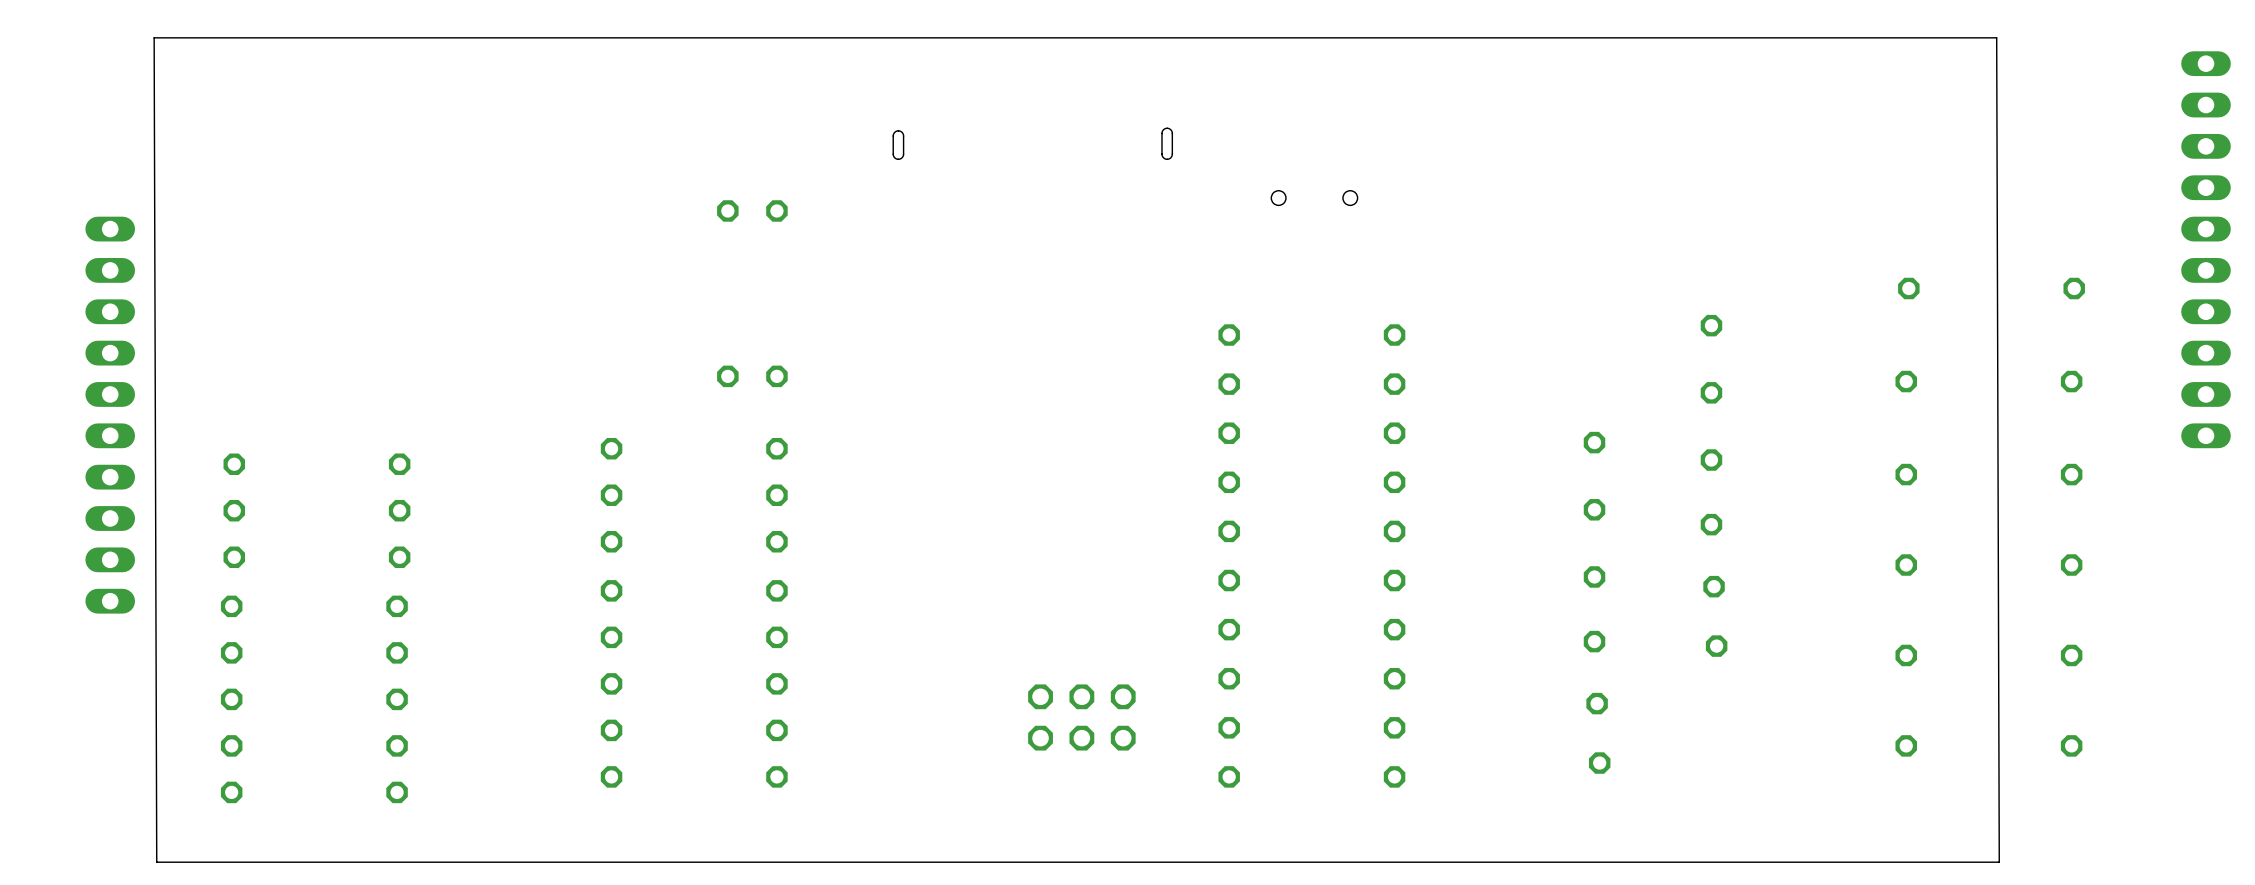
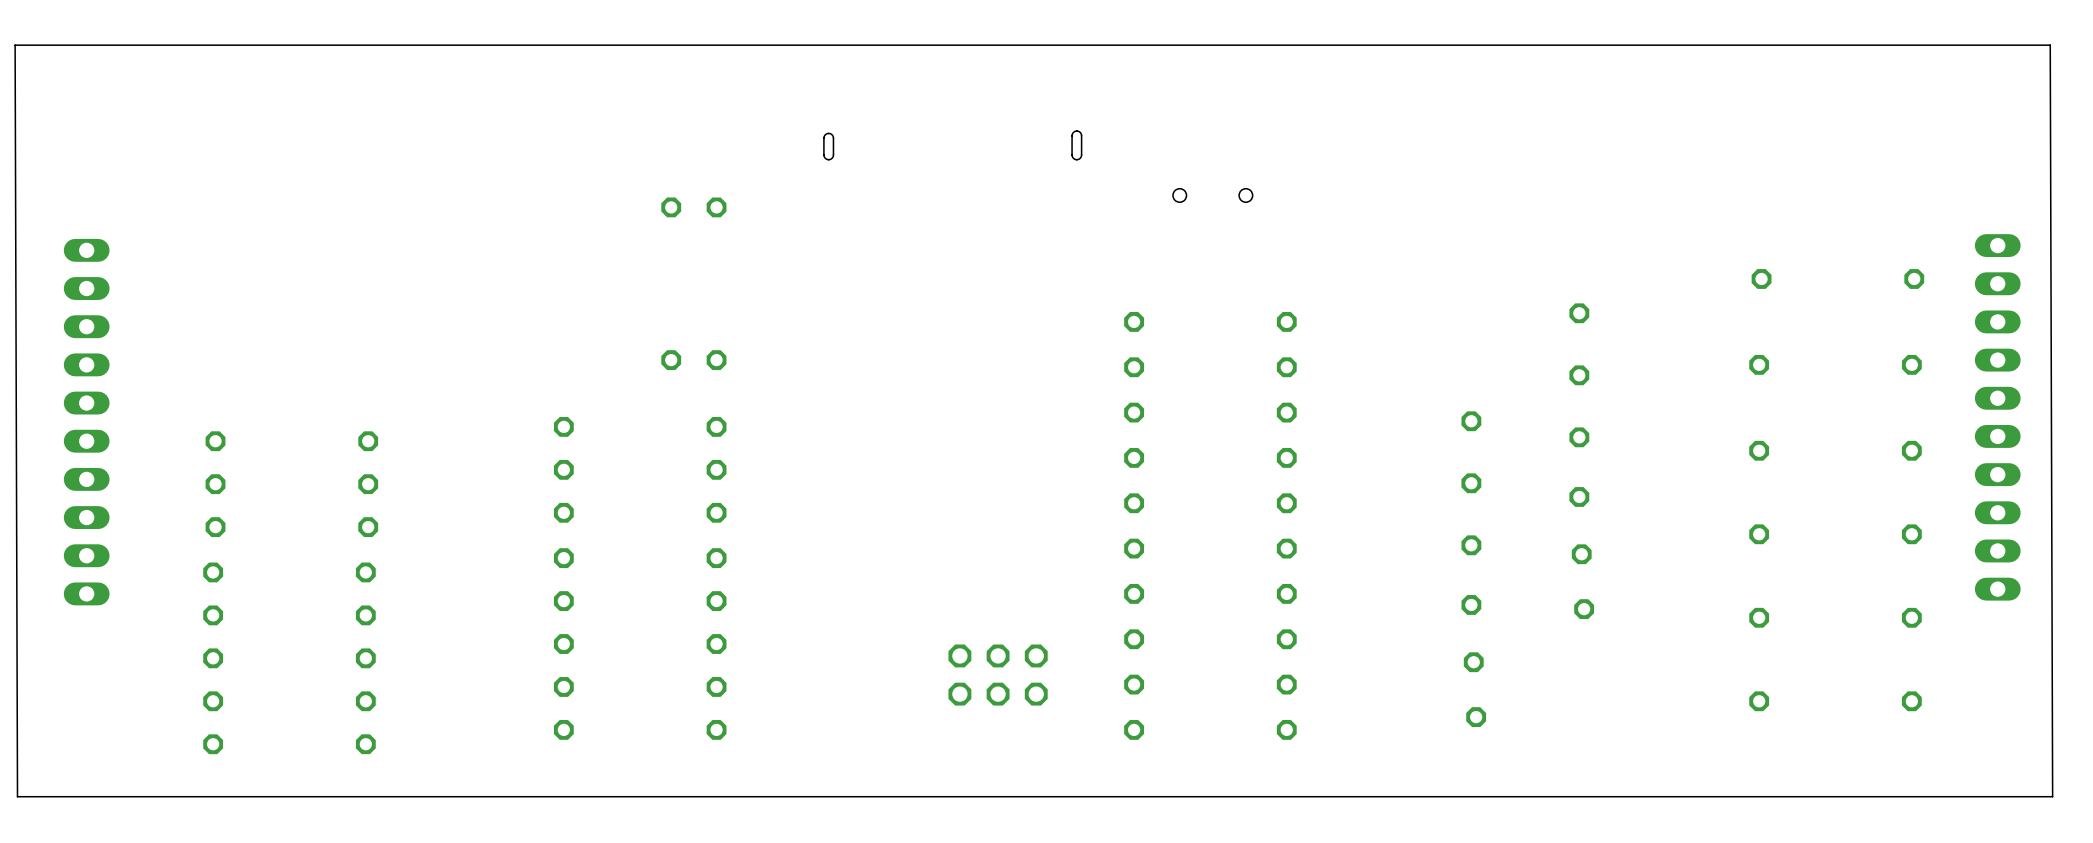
board edge: (1996, 37) (154, 37) (156, 862) (1999, 862) (1996, 37) -> (2050, 45) (2052, 796) (17, 796) (15, 45) (2050, 45)
part position: (2206, 249) -> (1997, 417)
part position: (110, 415) -> (86, 422)

